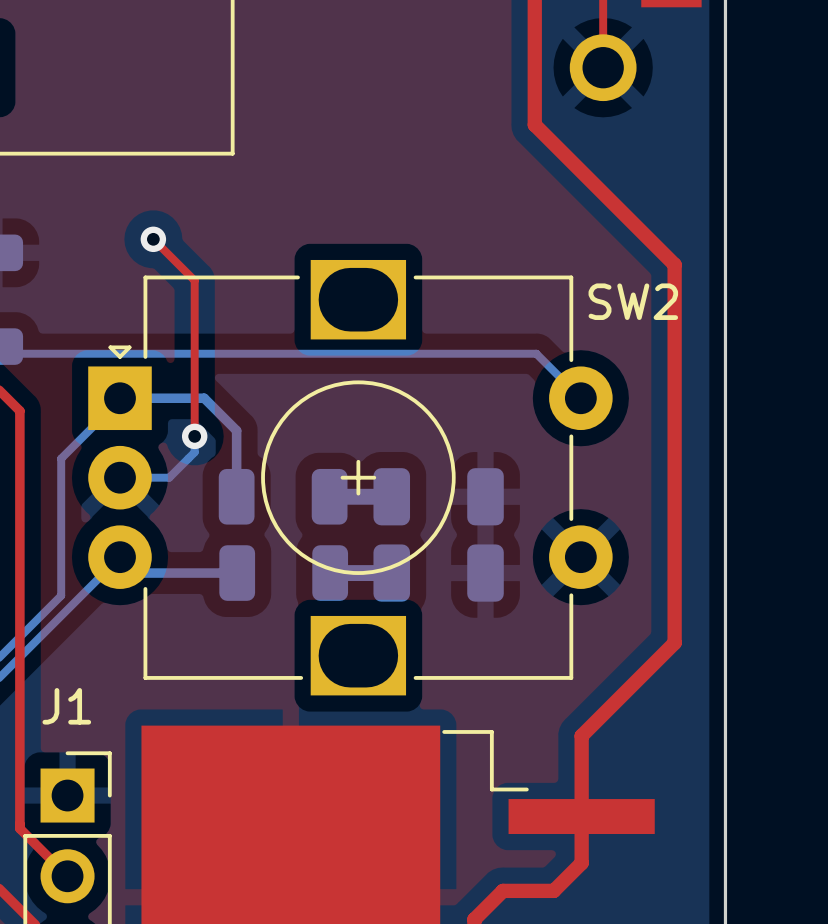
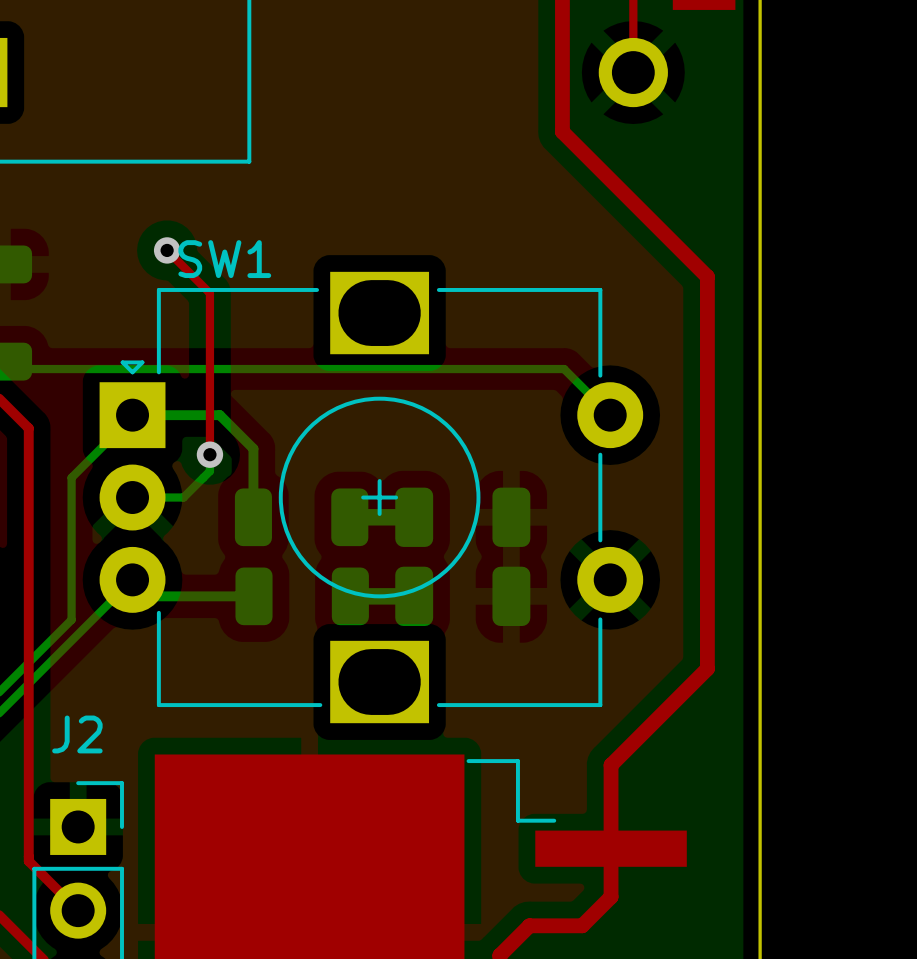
SW2 name: SW2 (633, 301) -> SW1 (224, 259)
J1 name: J1 (66, 706) -> J2 (77, 734)

